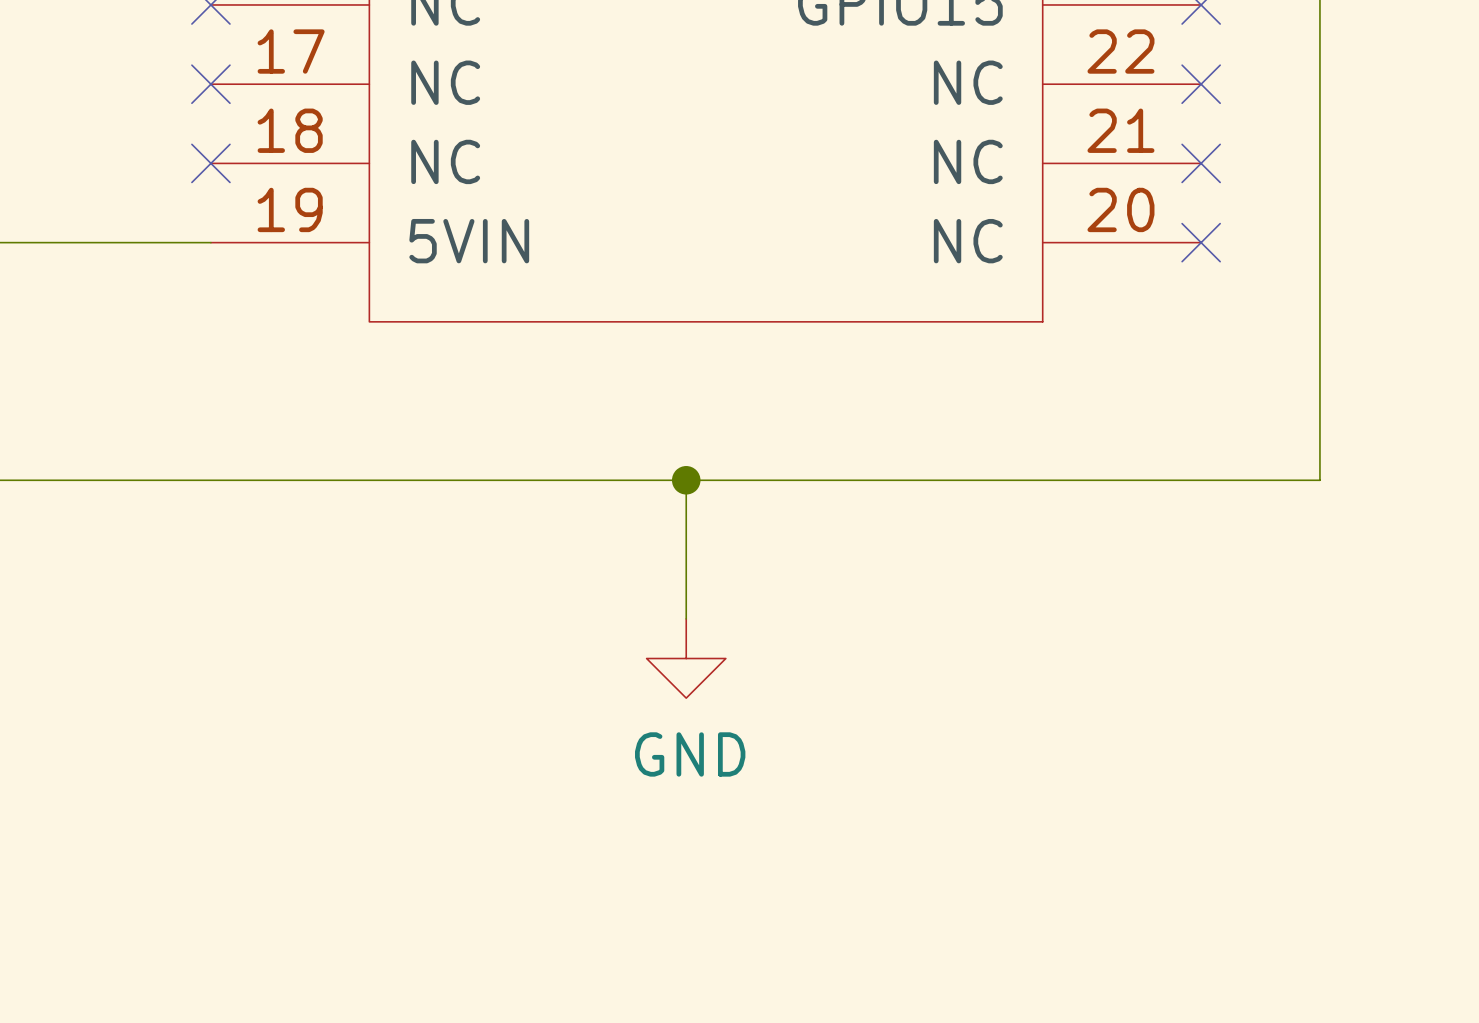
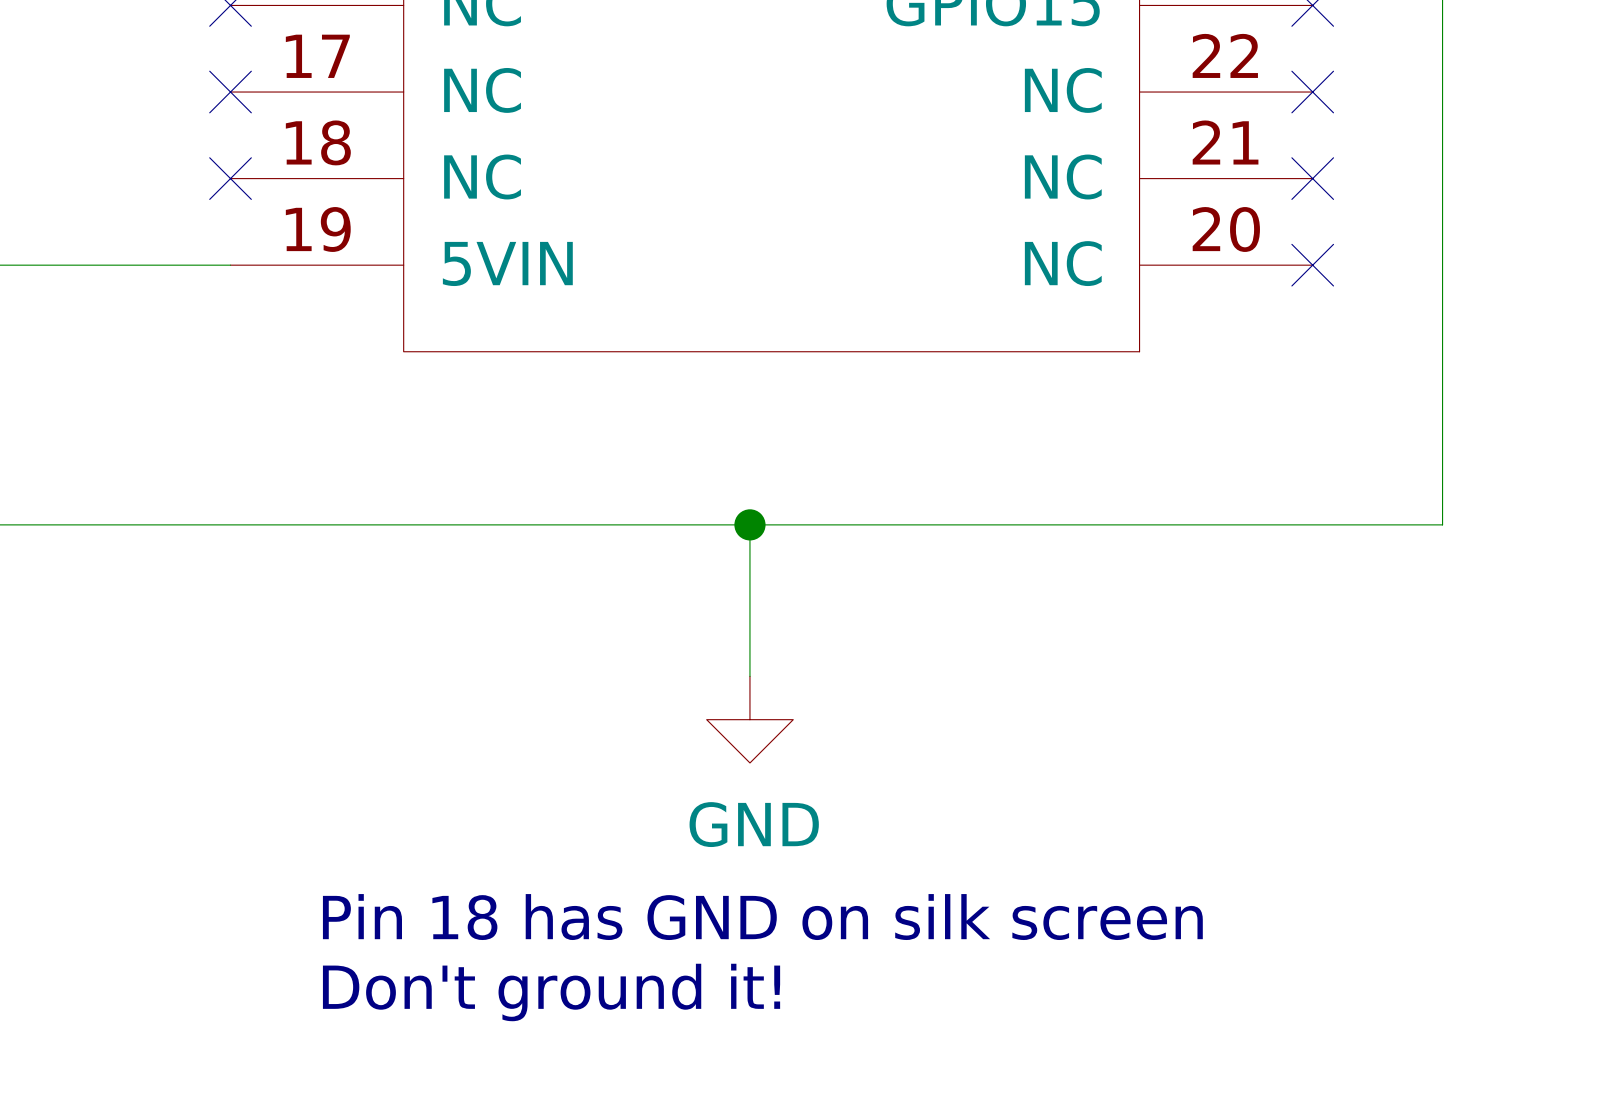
text: none -> Pin 18 has GND on silk screen (762, 917)
text: none -> Don't ground it! (551, 992)

